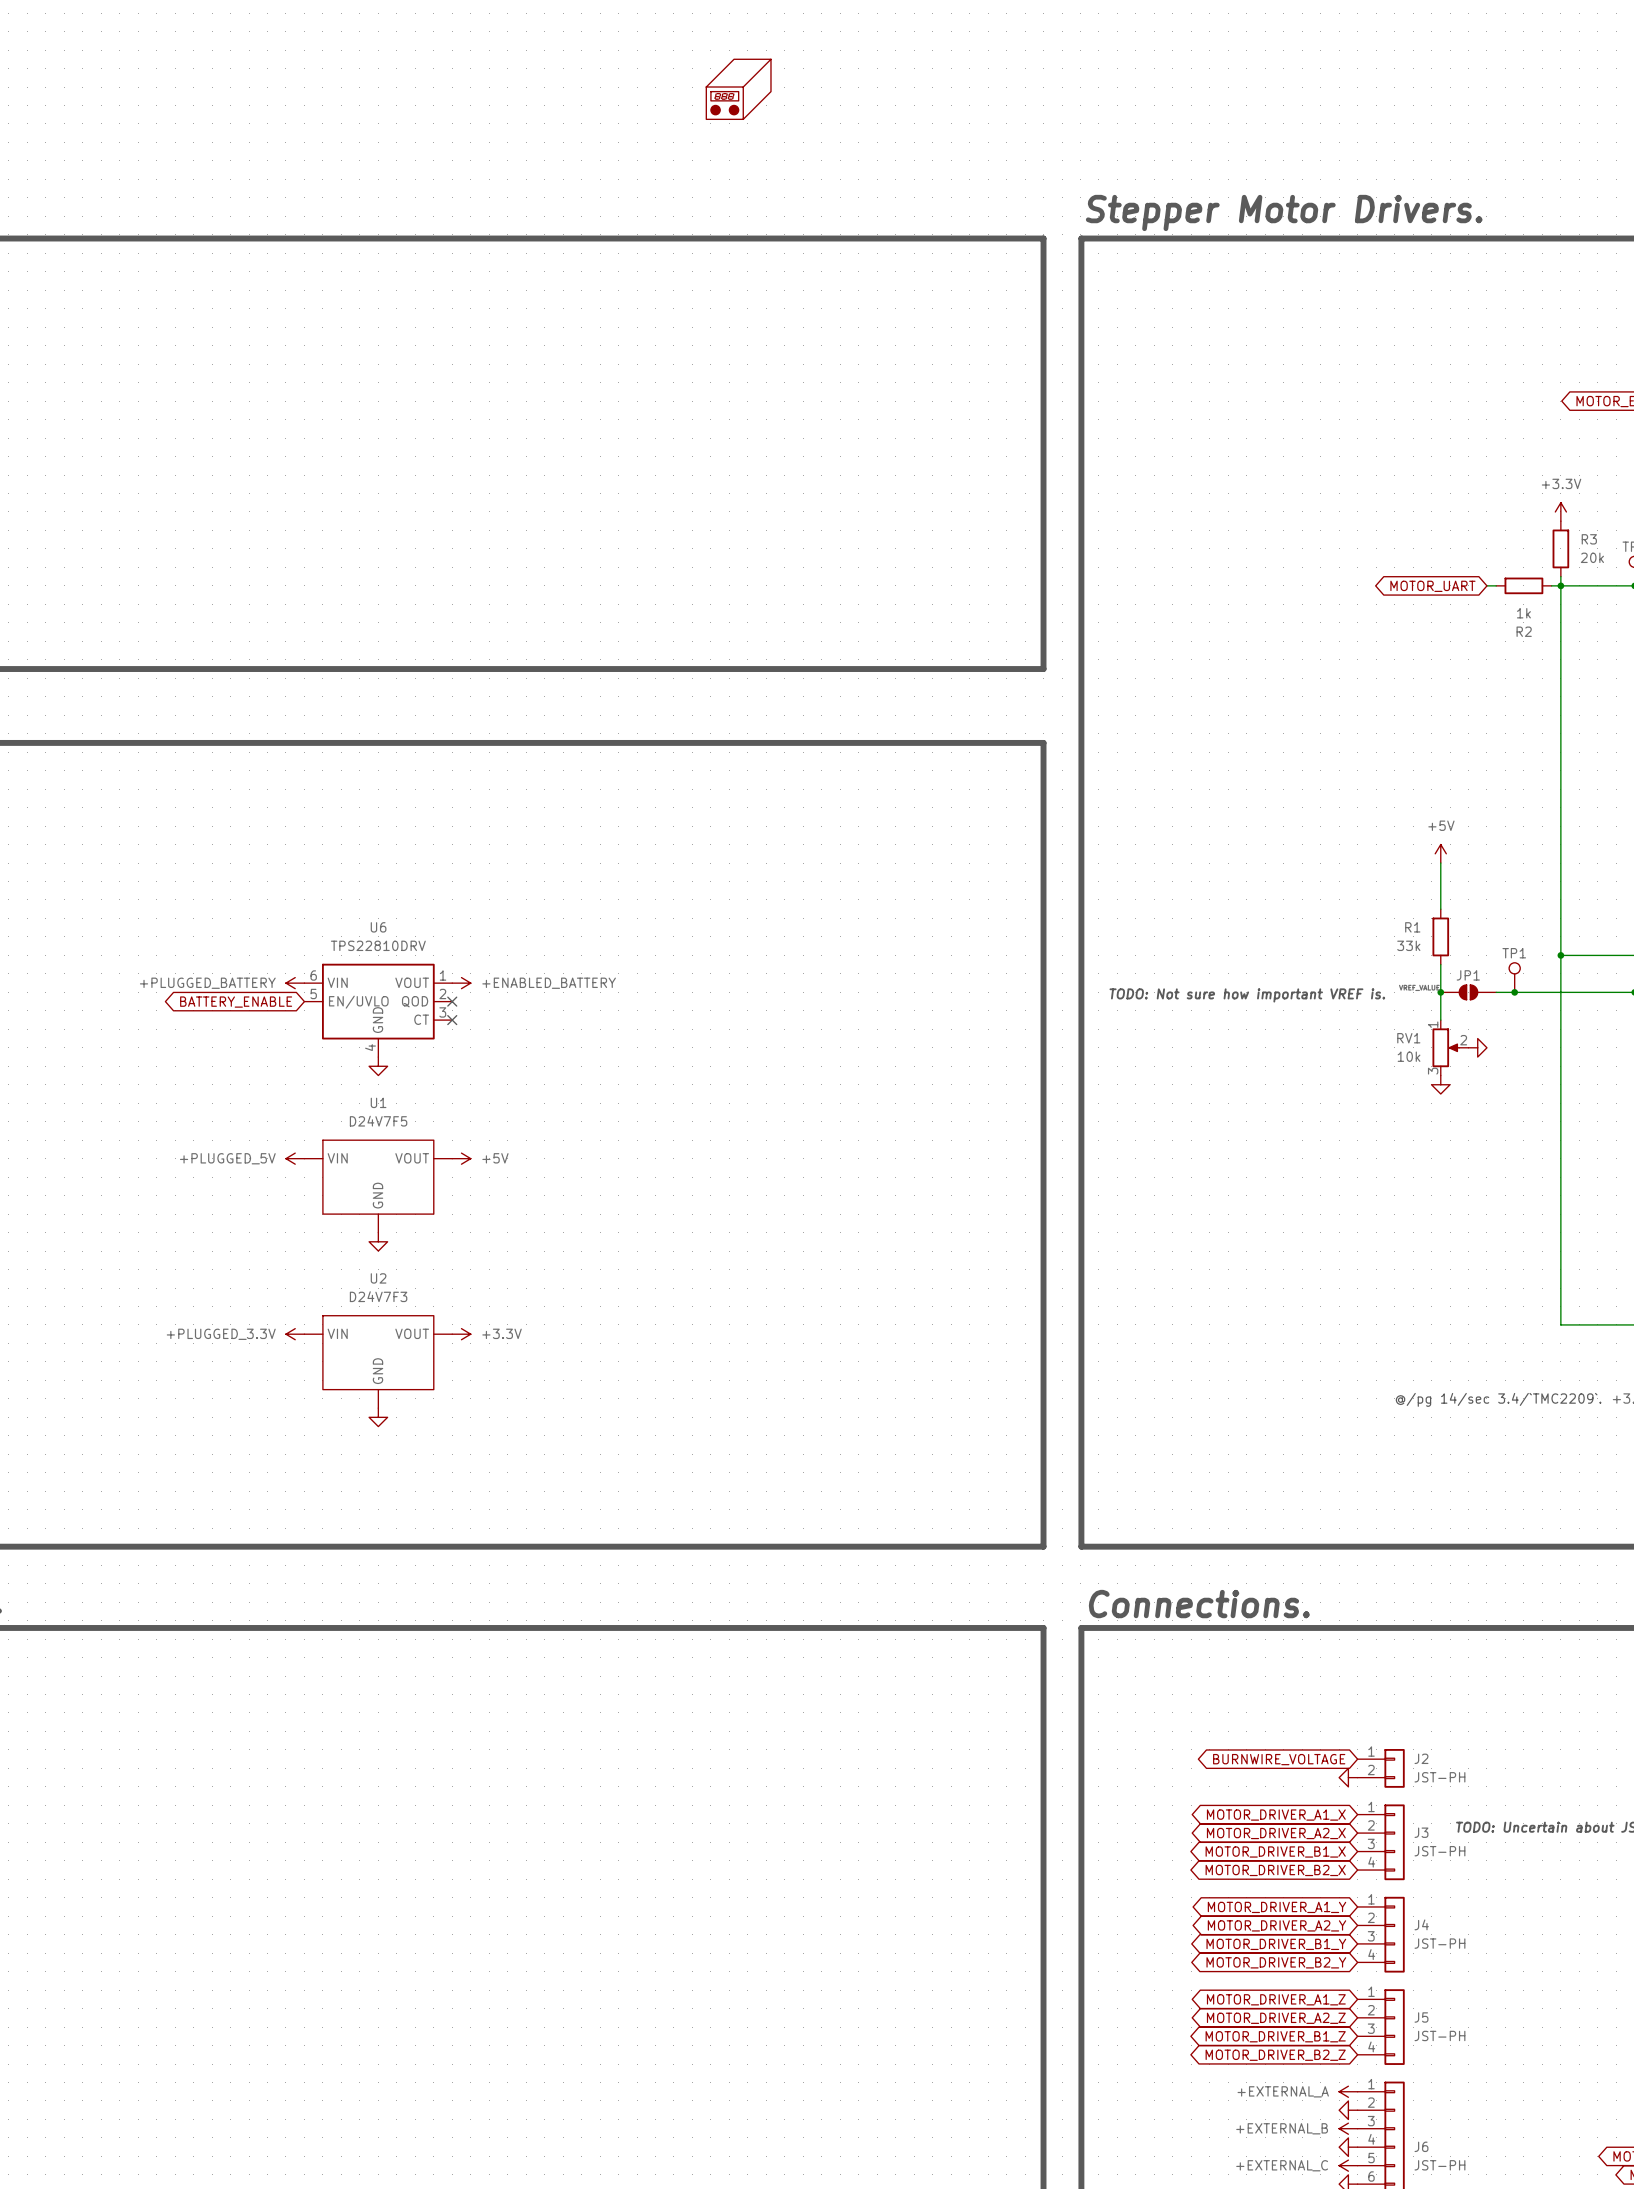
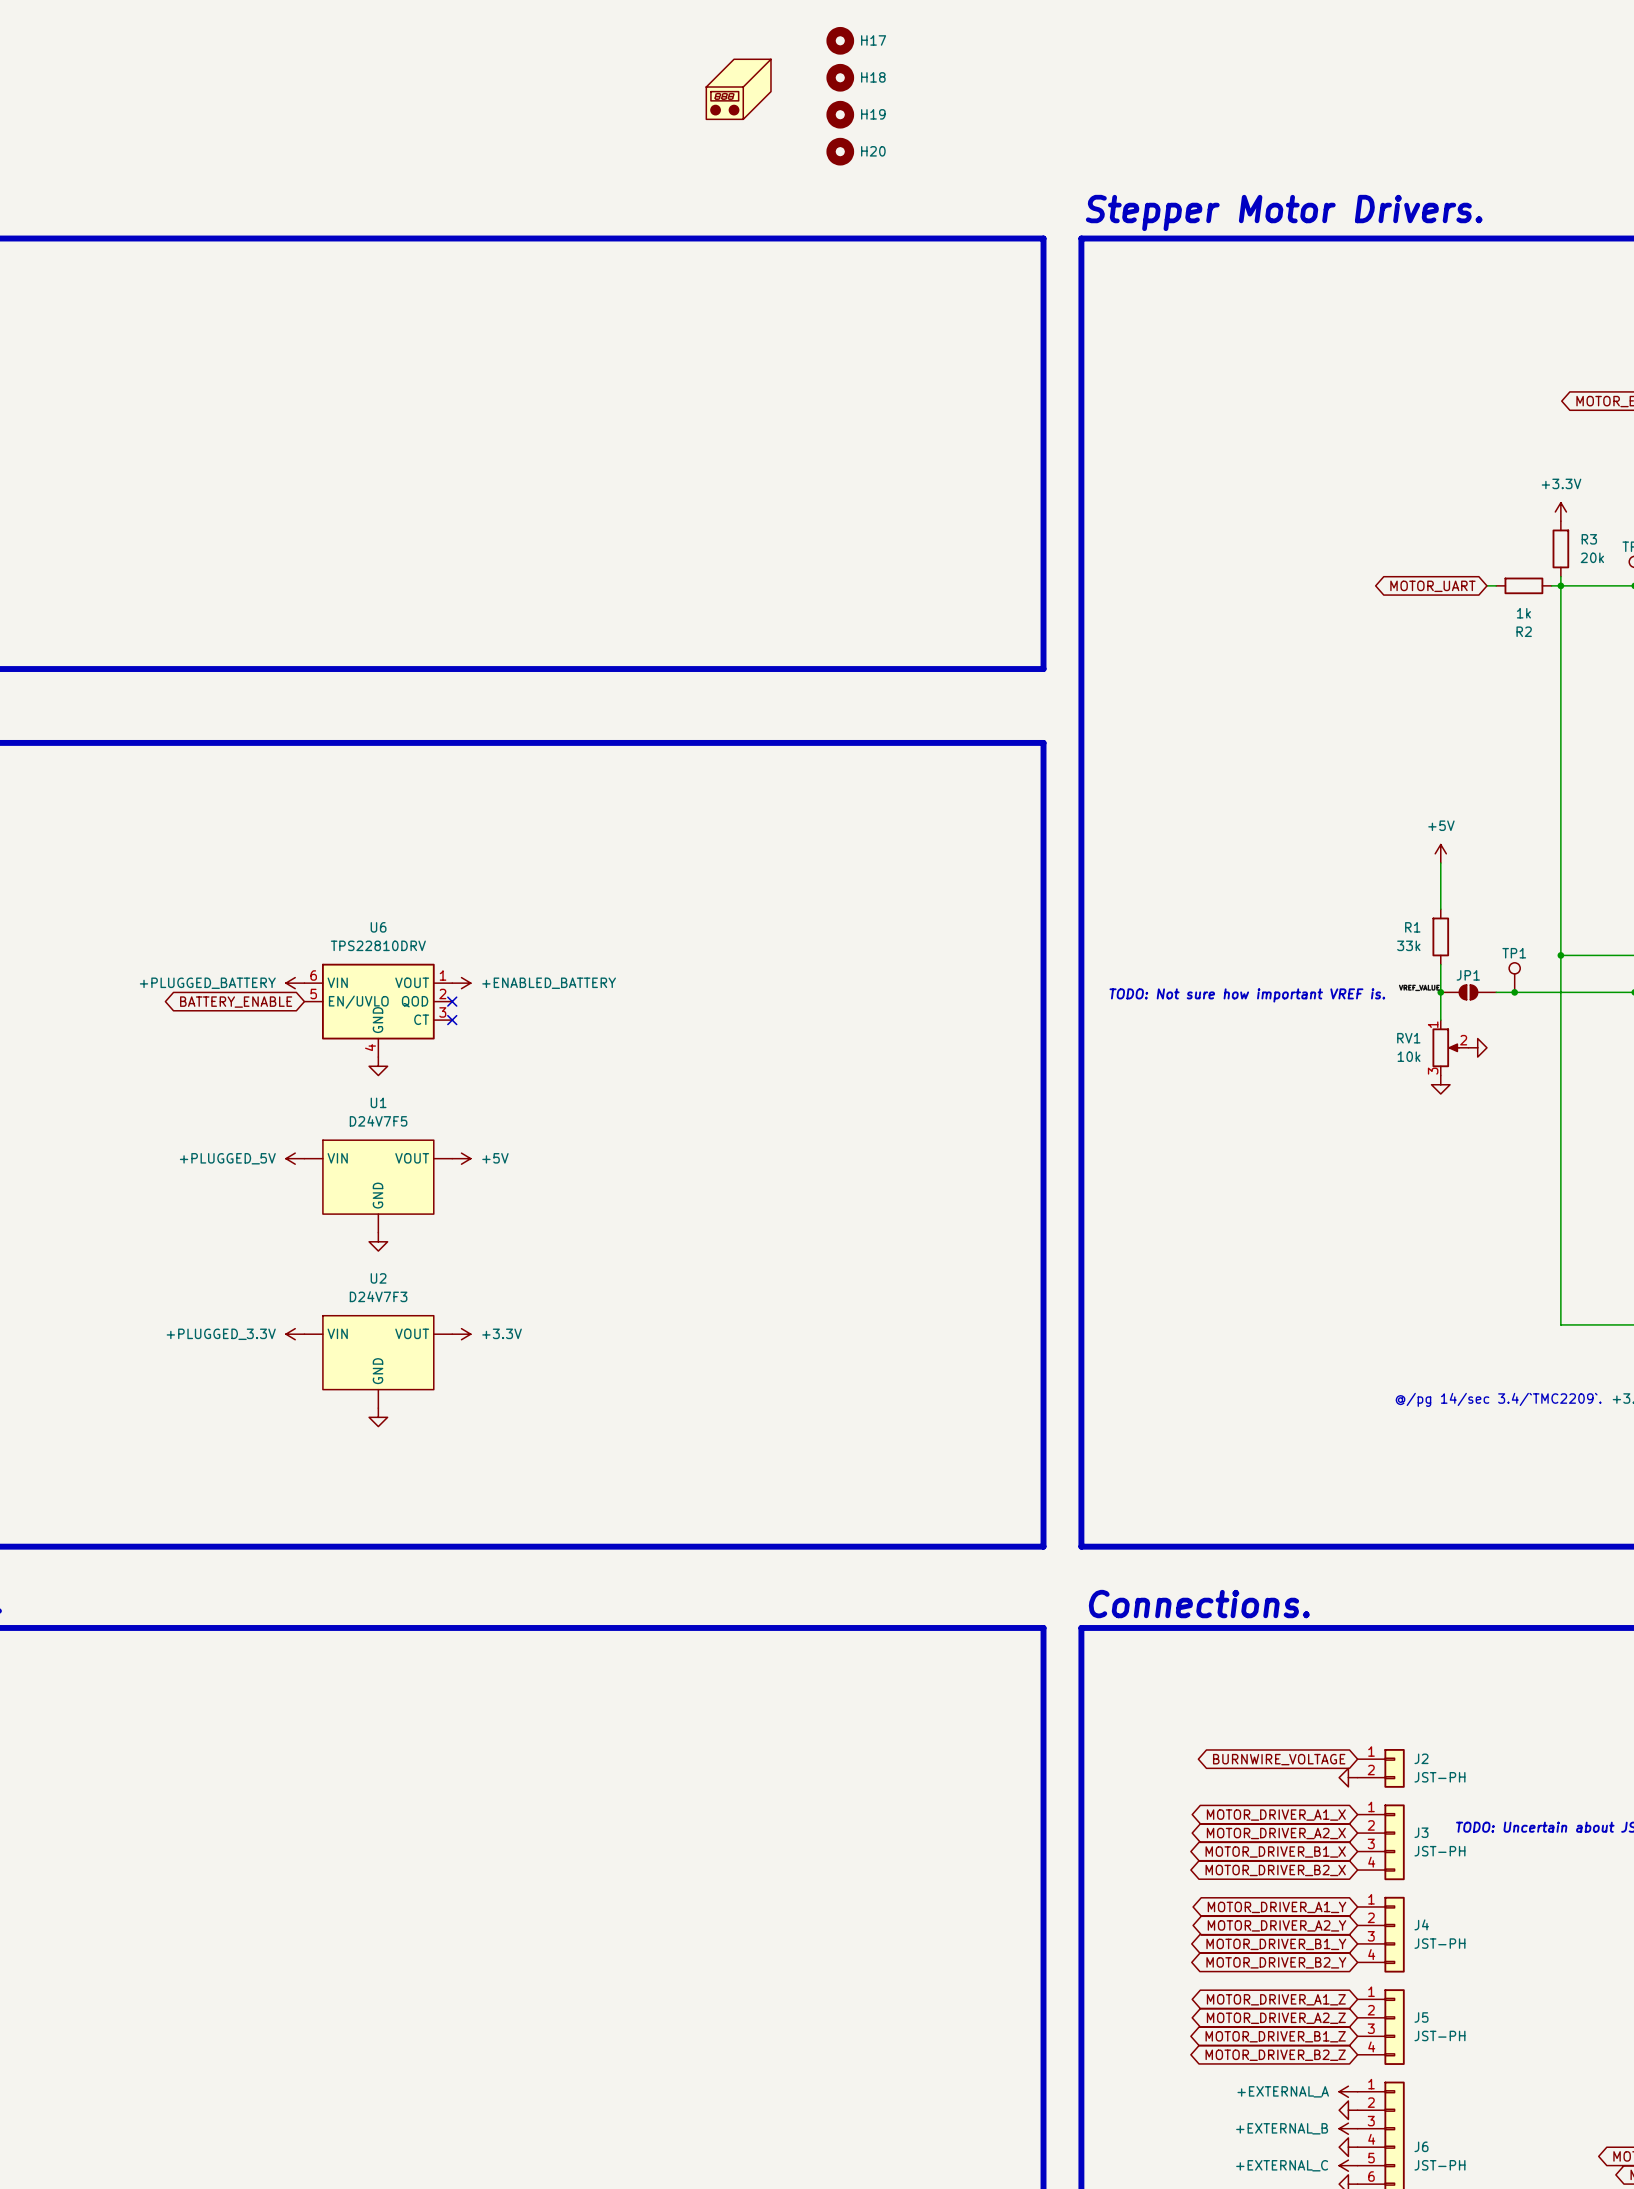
H17: none -> (840, 40)
H18: none -> (840, 77)
H19: none -> (840, 114)
H20: none -> (840, 151)

